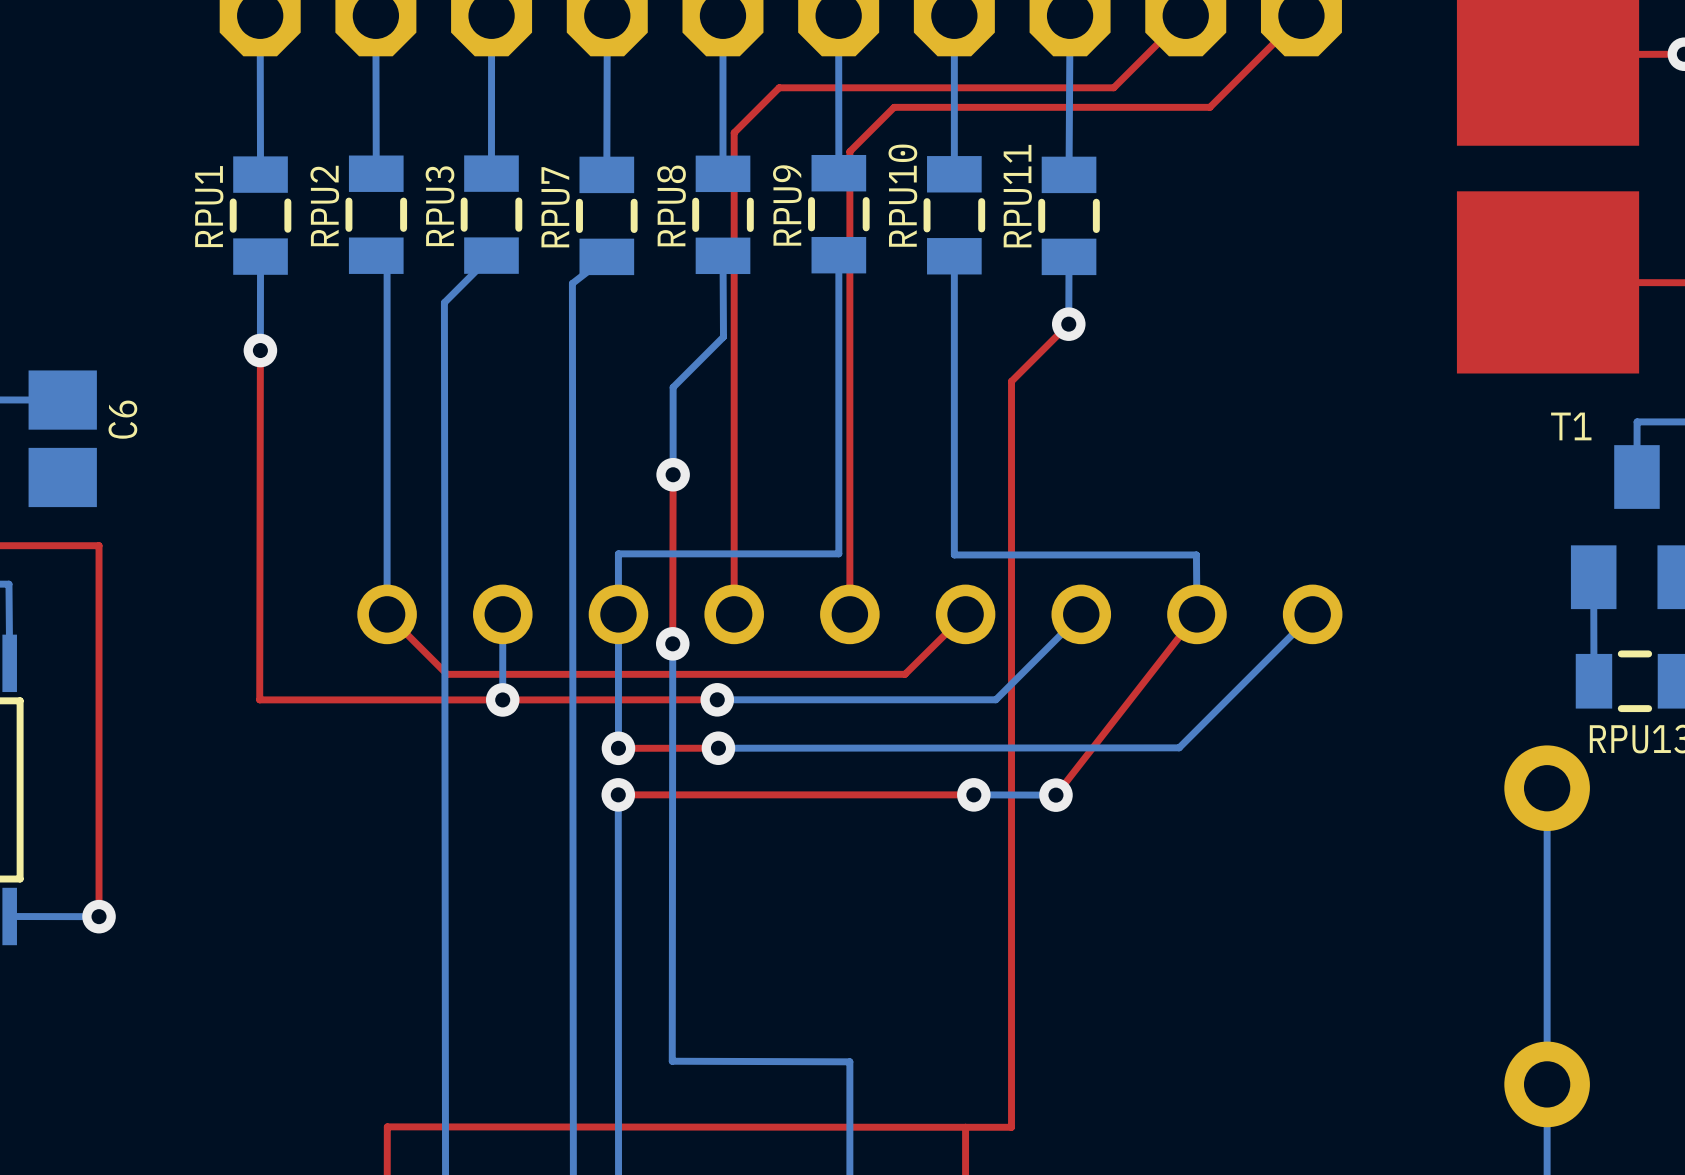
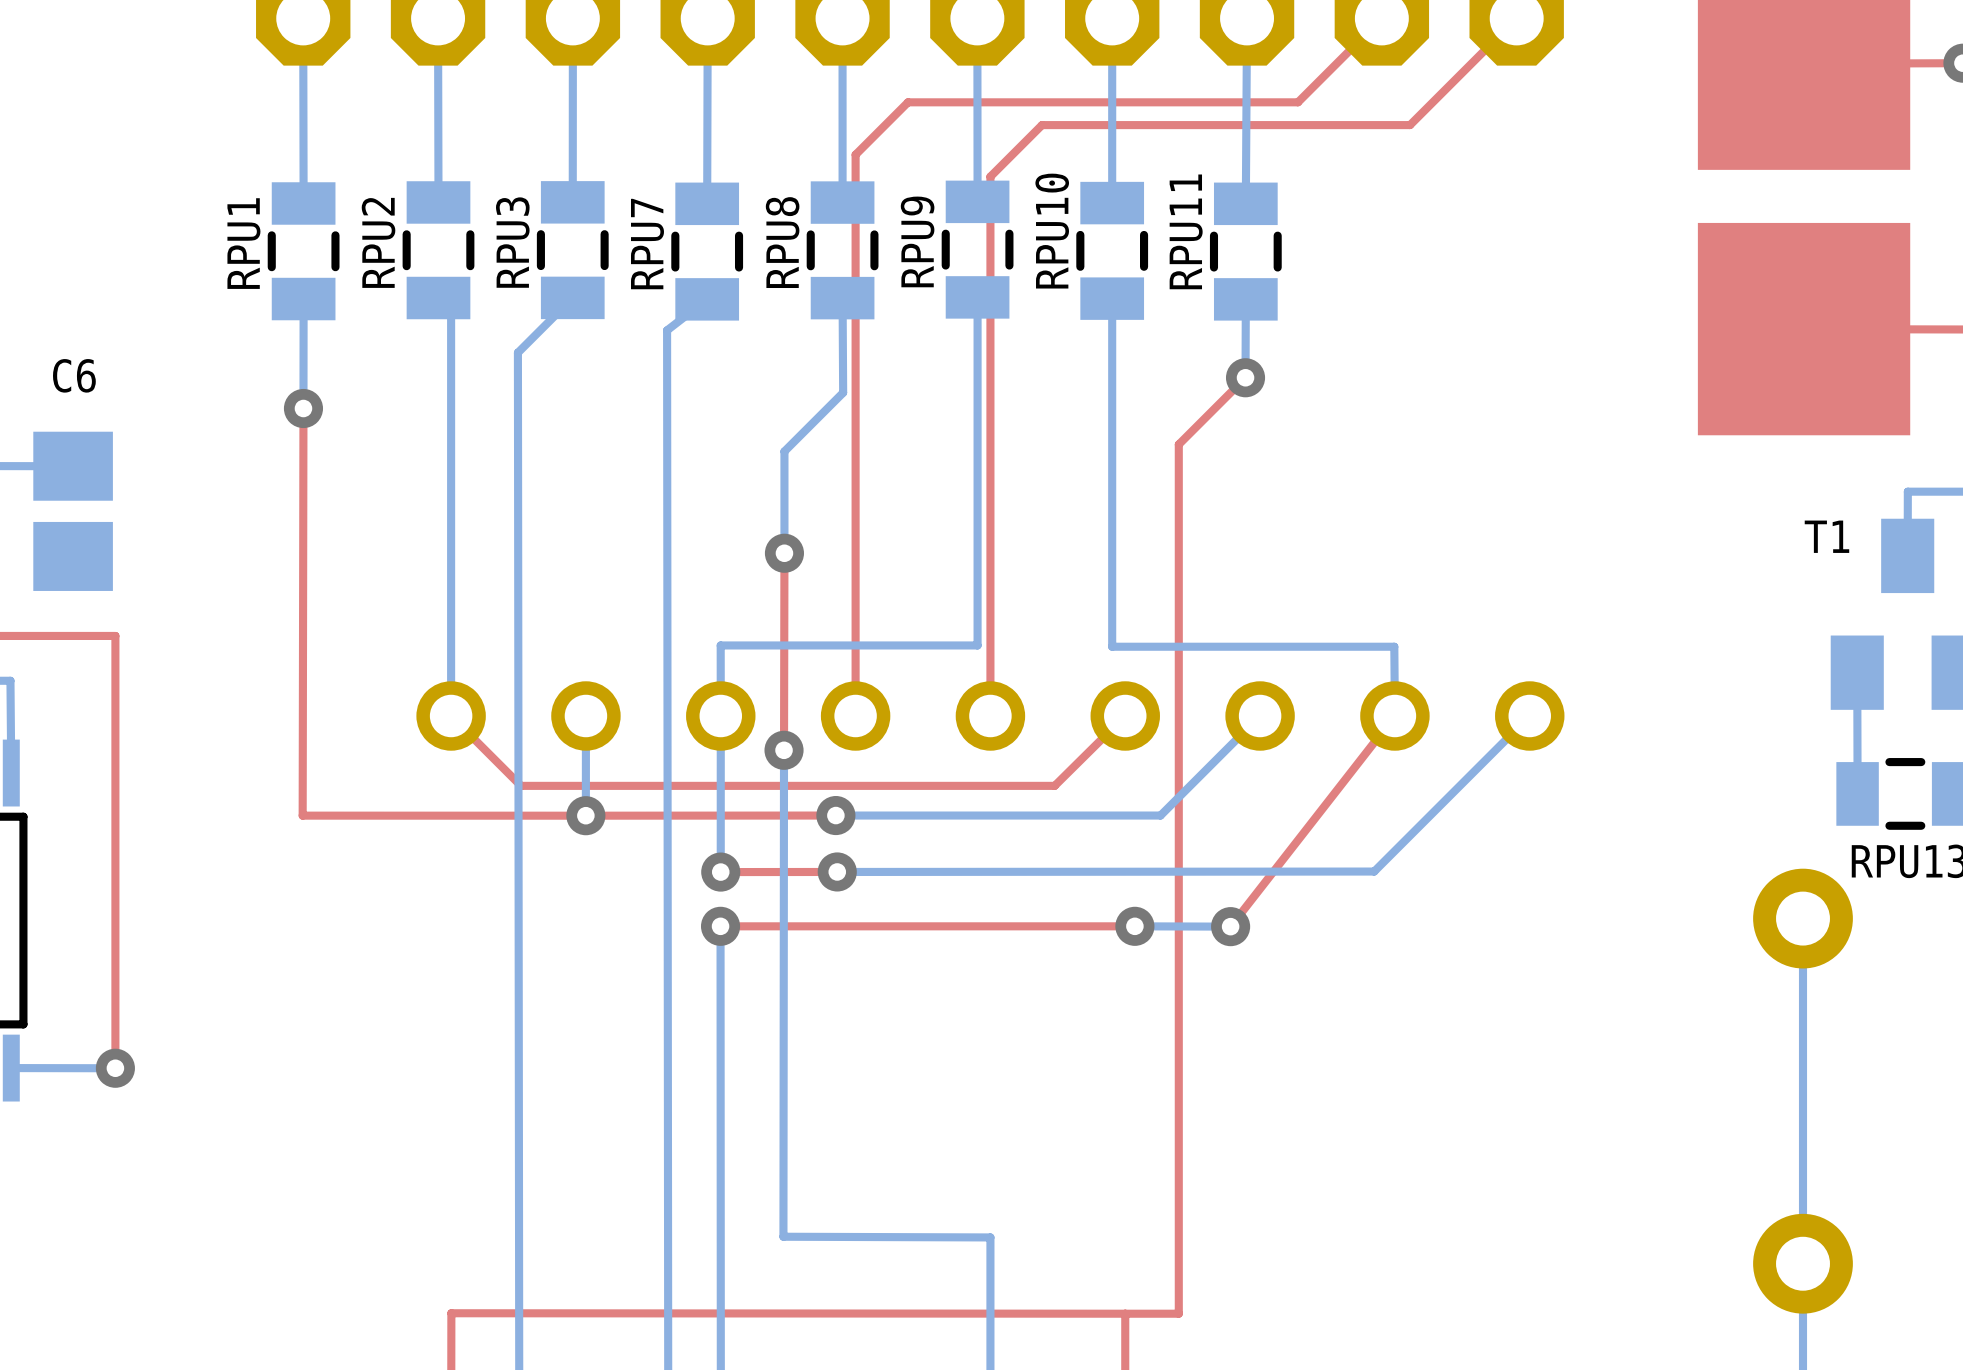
C6 name rotation: 0° (122, 419) -> 90° clockwise (74, 375)
C6 name position: C6 (122, 419) -> C6 (74, 375)
T1 name position: T1 (1571, 426) -> T1 (1826, 536)

